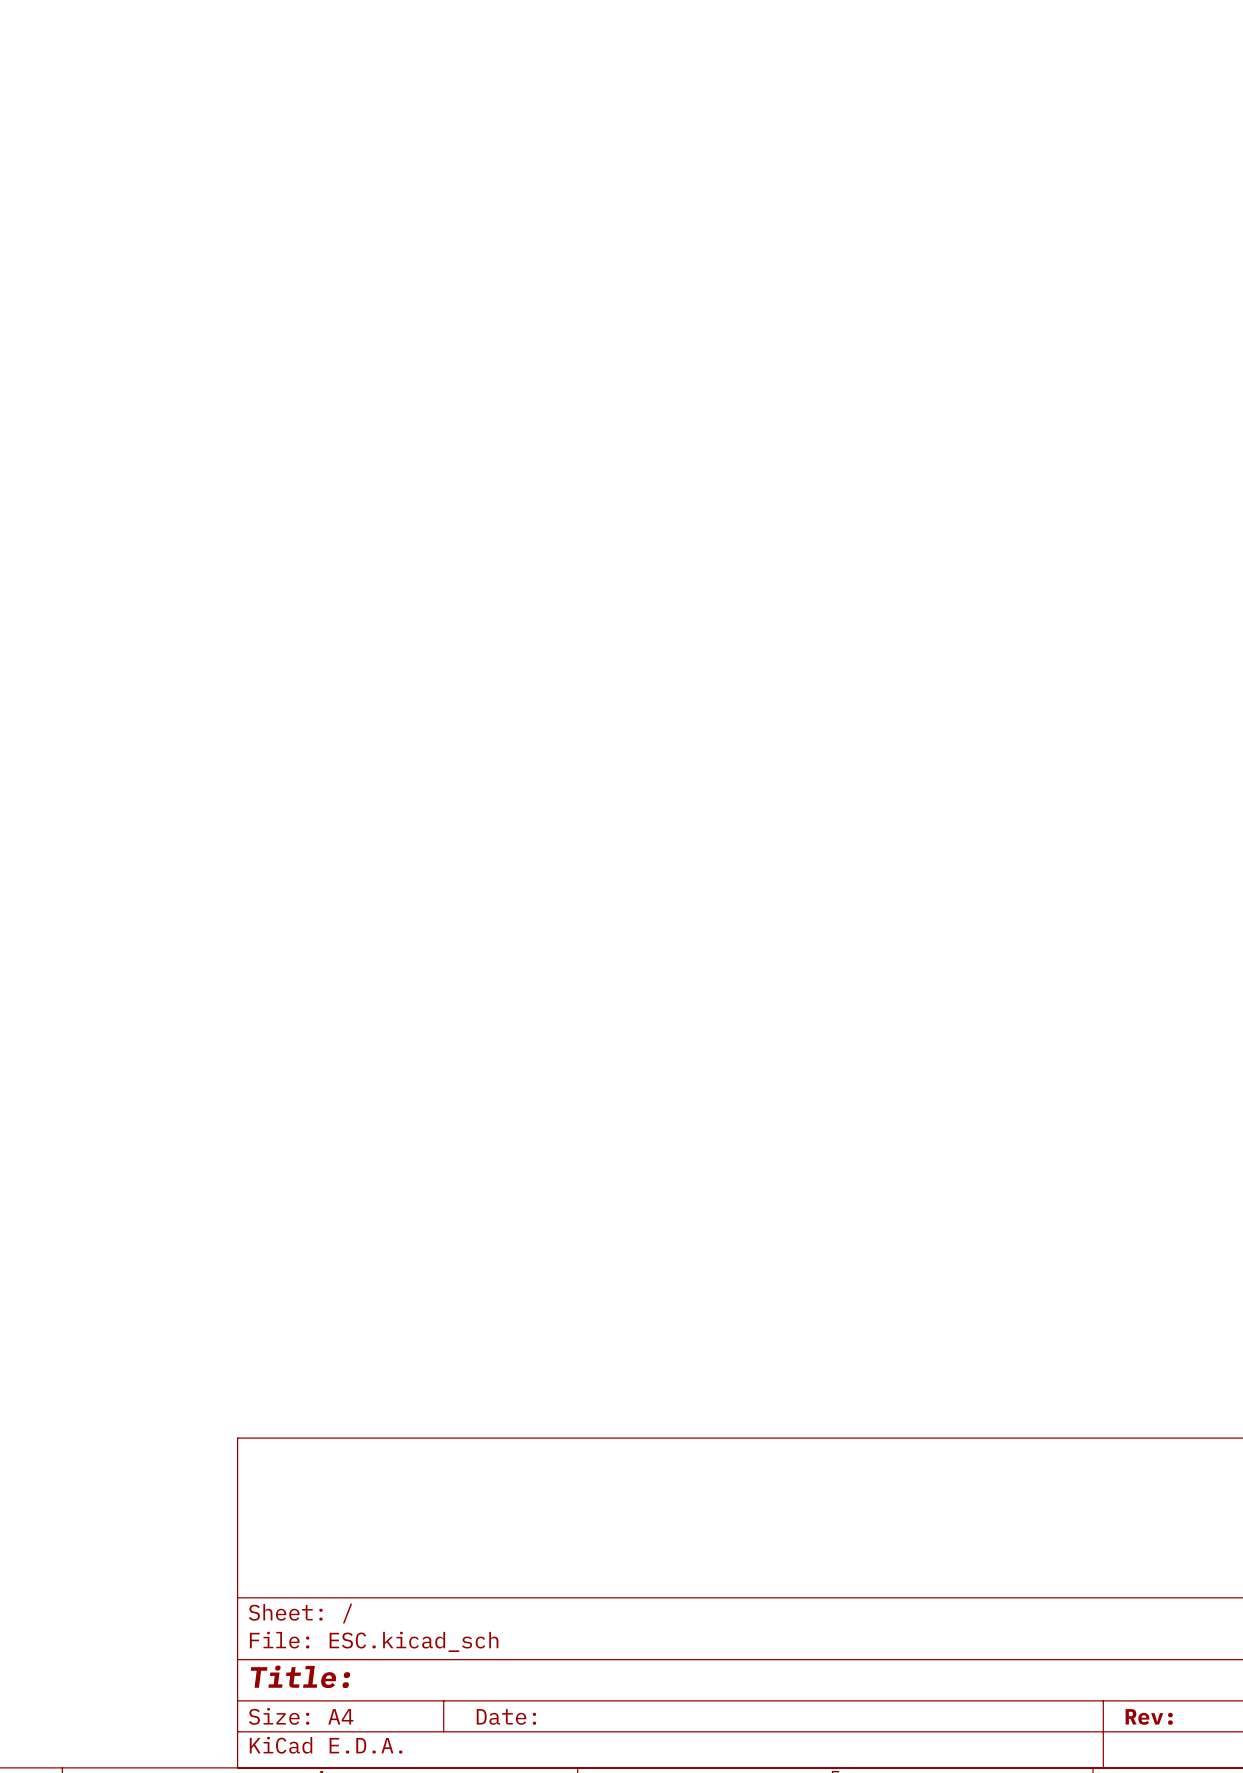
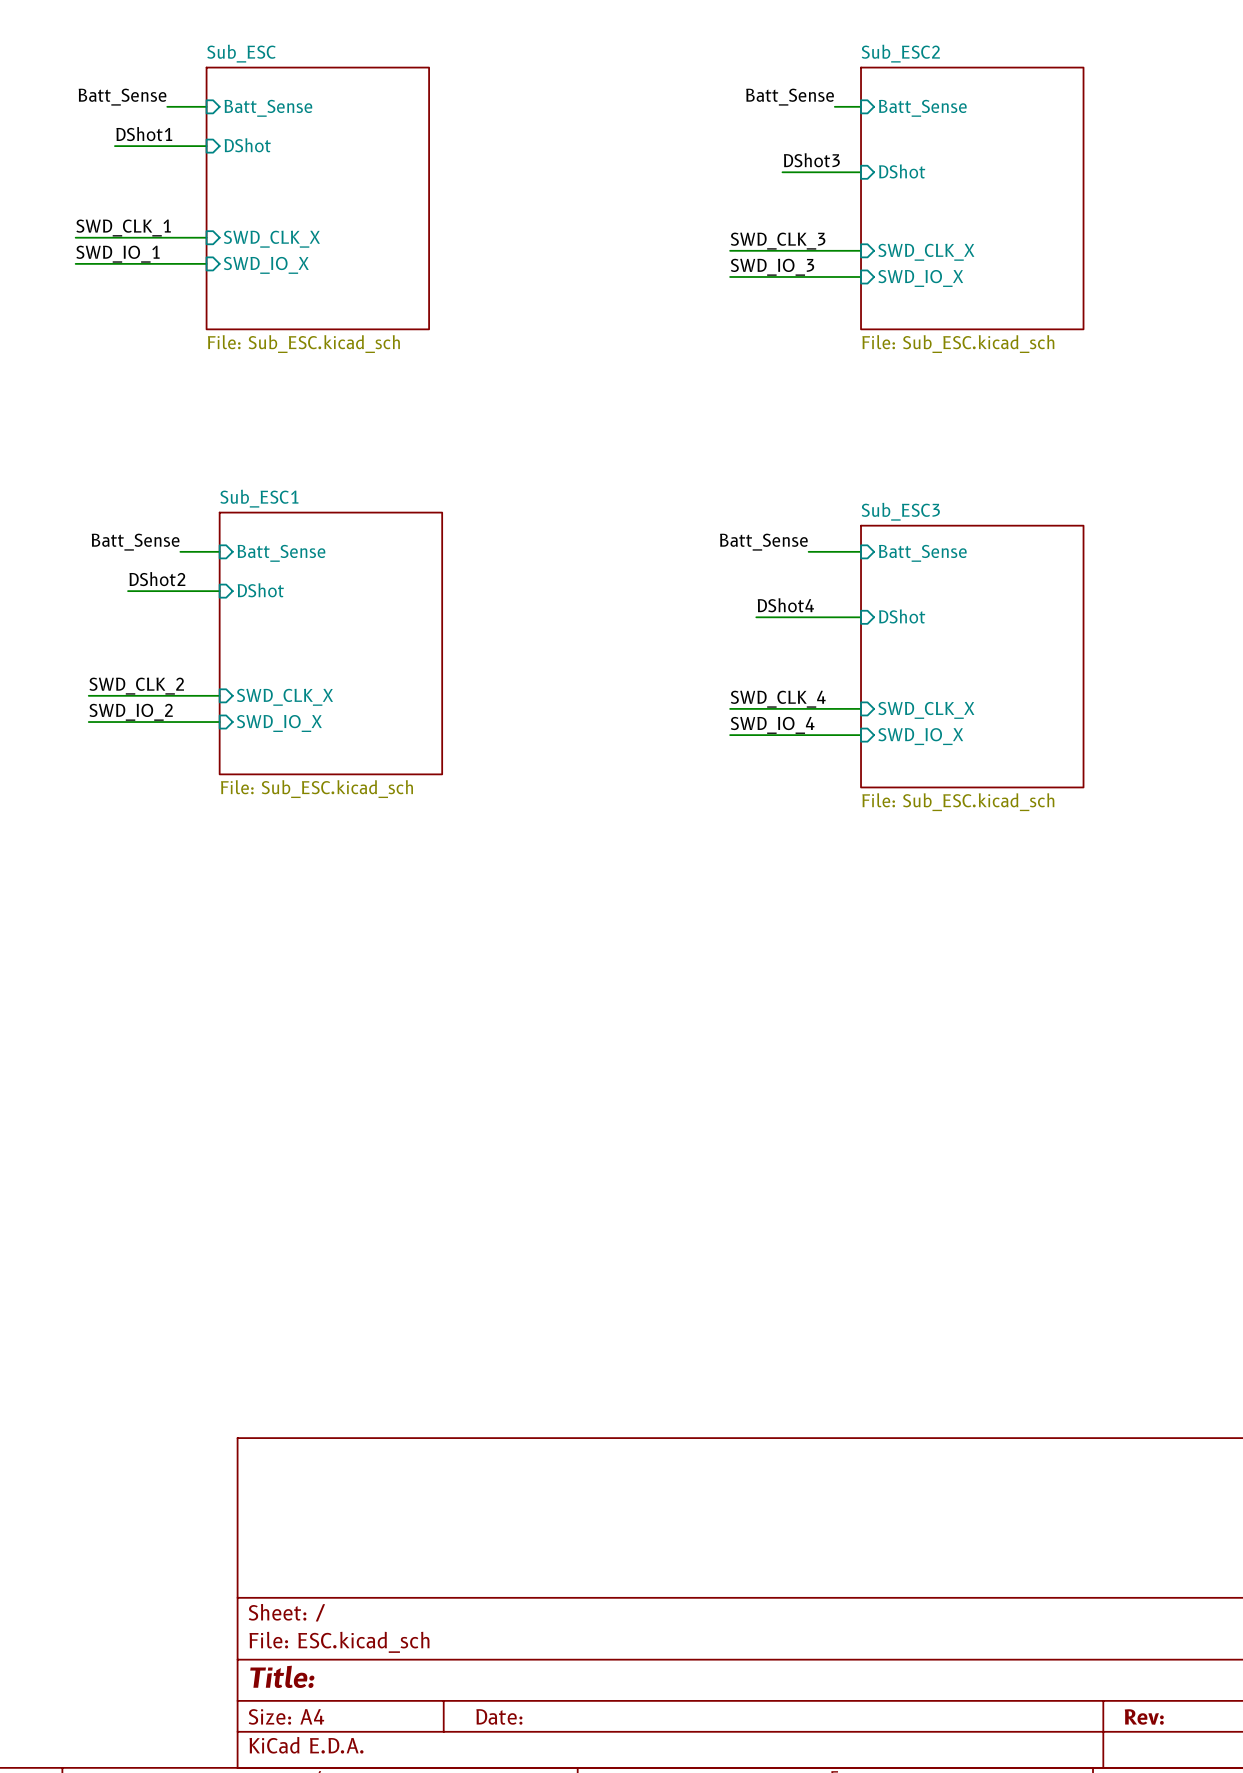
label: none -> Batt_Sense (122, 97)
label: none -> Batt_Sense (790, 97)
wire: none -> (167, 106) (206, 106)
wire: none -> (834, 106) (861, 106)
sheet pin: none -> Batt_Sense (268, 108)
sheet pin: none -> Batt_Sense (922, 108)
label: none -> DShot1 (144, 134)
sheet pin: none -> DShot (247, 145)
wire: none -> (114, 146) (206, 146)
label: none -> DShot3 (811, 160)
sheet pin: none -> DShot (902, 171)
wire: none -> (782, 172) (861, 172)
sheet Sub_ESC: none -> File: Sub_ESC.kicad_sch (317, 198)
sheet Sub_ESC2: none -> File: Sub_ESC.kicad_sch (972, 198)
label: none -> SWD_CLK_1 (123, 228)
wire: none -> (75, 237) (206, 237)
sheet pin: none -> SWD_CLK_X (271, 239)
label: none -> SWD_CLK_3 (778, 241)
wire: none -> (730, 250) (861, 250)
sheet pin: none -> SWD_CLK_X (926, 252)
label: none -> SWD_IO_1 (118, 254)
wire: none -> (75, 263) (206, 263)
sheet pin: none -> SWD_IO_X (266, 265)
label: none -> SWD_IO_3 (772, 267)
wire: none -> (730, 276) (861, 276)
sheet pin: none -> SWD_IO_X (920, 278)
label: none -> Batt_Sense (135, 542)
label: none -> Batt_Sense (763, 542)
wire: none -> (180, 551) (219, 551)
wire: none -> (808, 551) (861, 551)
sheet pin: none -> Batt_Sense (281, 553)
sheet pin: none -> Batt_Sense (922, 553)
label: none -> DShot2 (157, 579)
sheet pin: none -> DShot (260, 590)
wire: none -> (128, 591) (219, 591)
label: none -> DShot4 (785, 605)
sheet pin: none -> DShot (902, 616)
wire: none -> (756, 617) (861, 617)
sheet Sub_ESC1: none -> File: Sub_ESC.kicad_sch (330, 643)
sheet Sub_ESC3: none -> File: Sub_ESC.kicad_sch (972, 656)
label: none -> SWD_CLK_2 (136, 686)
wire: none -> (88, 695) (219, 695)
sheet pin: none -> SWD_CLK_X (285, 697)
label: none -> SWD_CLK_4 (778, 699)
wire: none -> (730, 708) (861, 708)
sheet pin: none -> SWD_CLK_X (926, 710)
label: none -> SWD_IO_2 (131, 712)
wire: none -> (88, 722) (219, 722)
sheet pin: none -> SWD_IO_X (279, 723)
label: none -> SWD_IO_4 (772, 725)
wire: none -> (730, 735) (861, 735)
sheet pin: none -> SWD_IO_X (920, 736)

